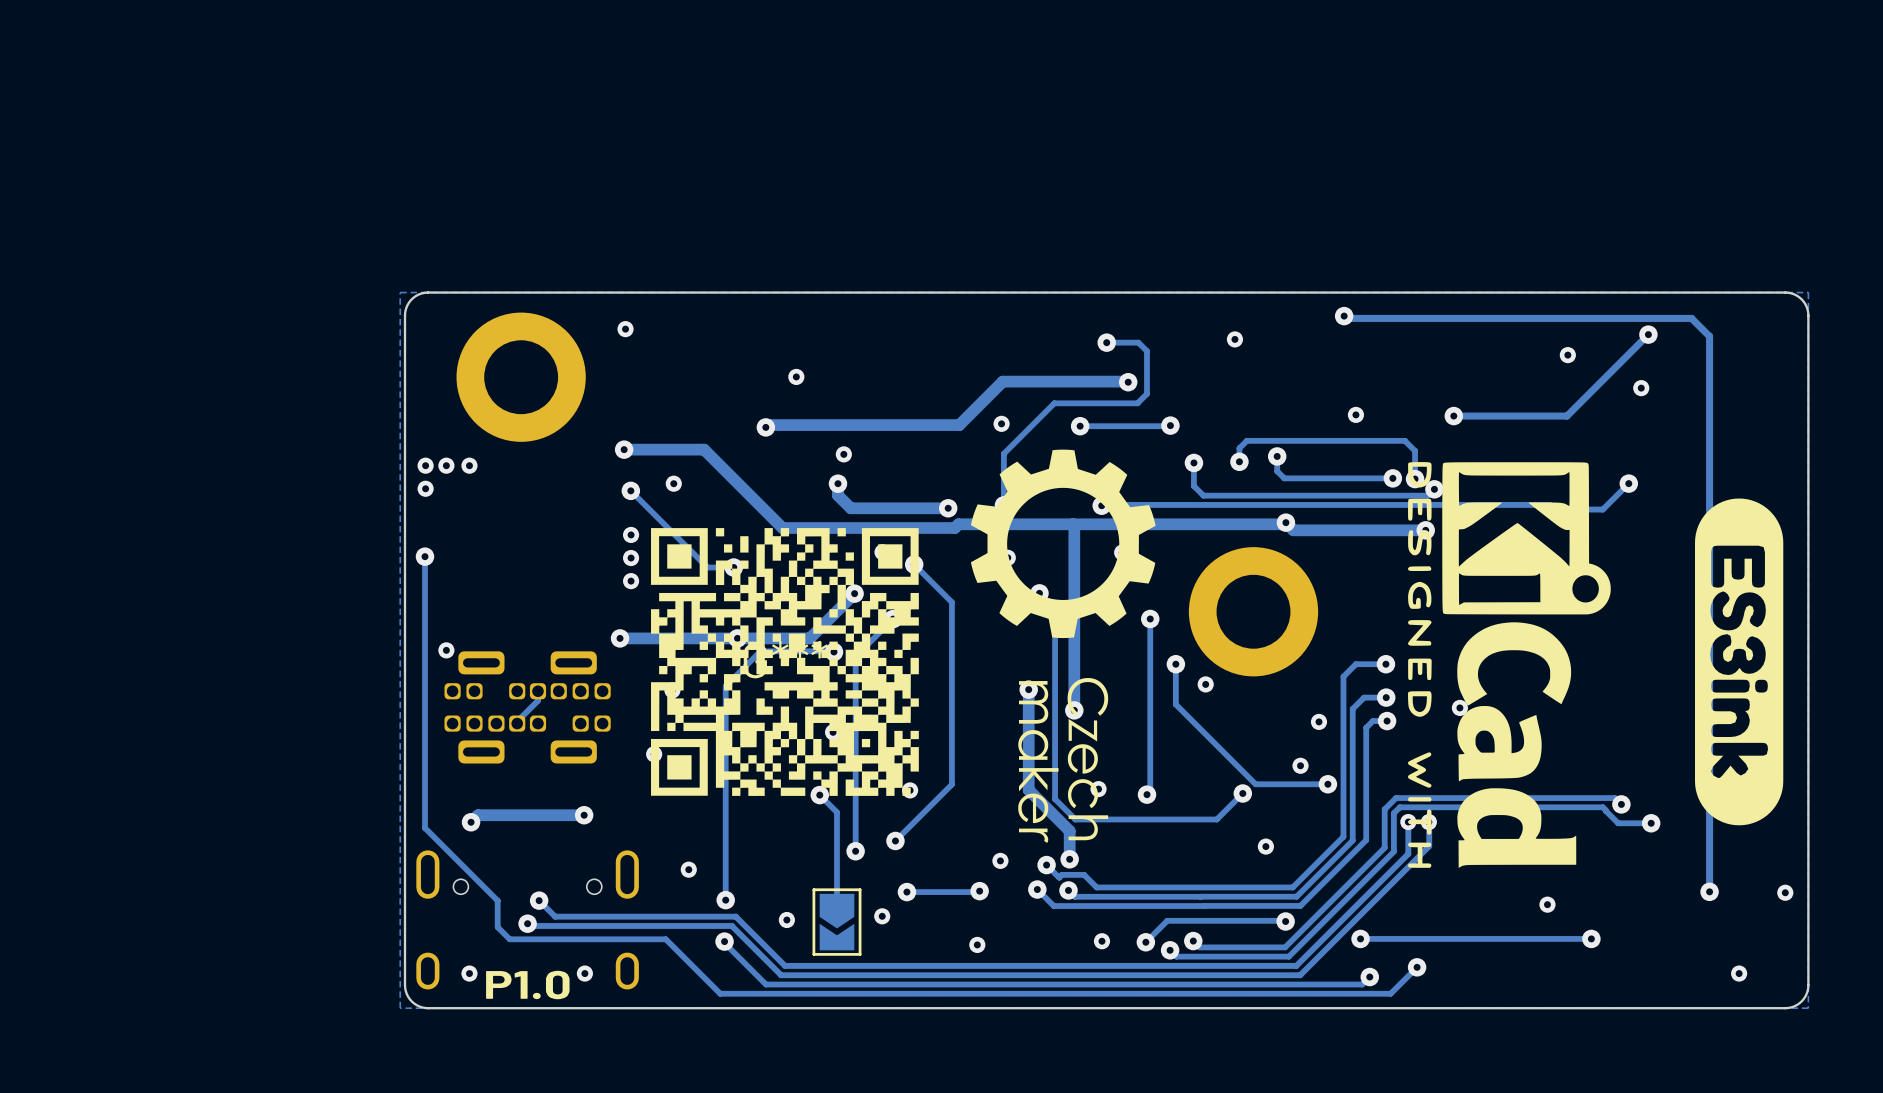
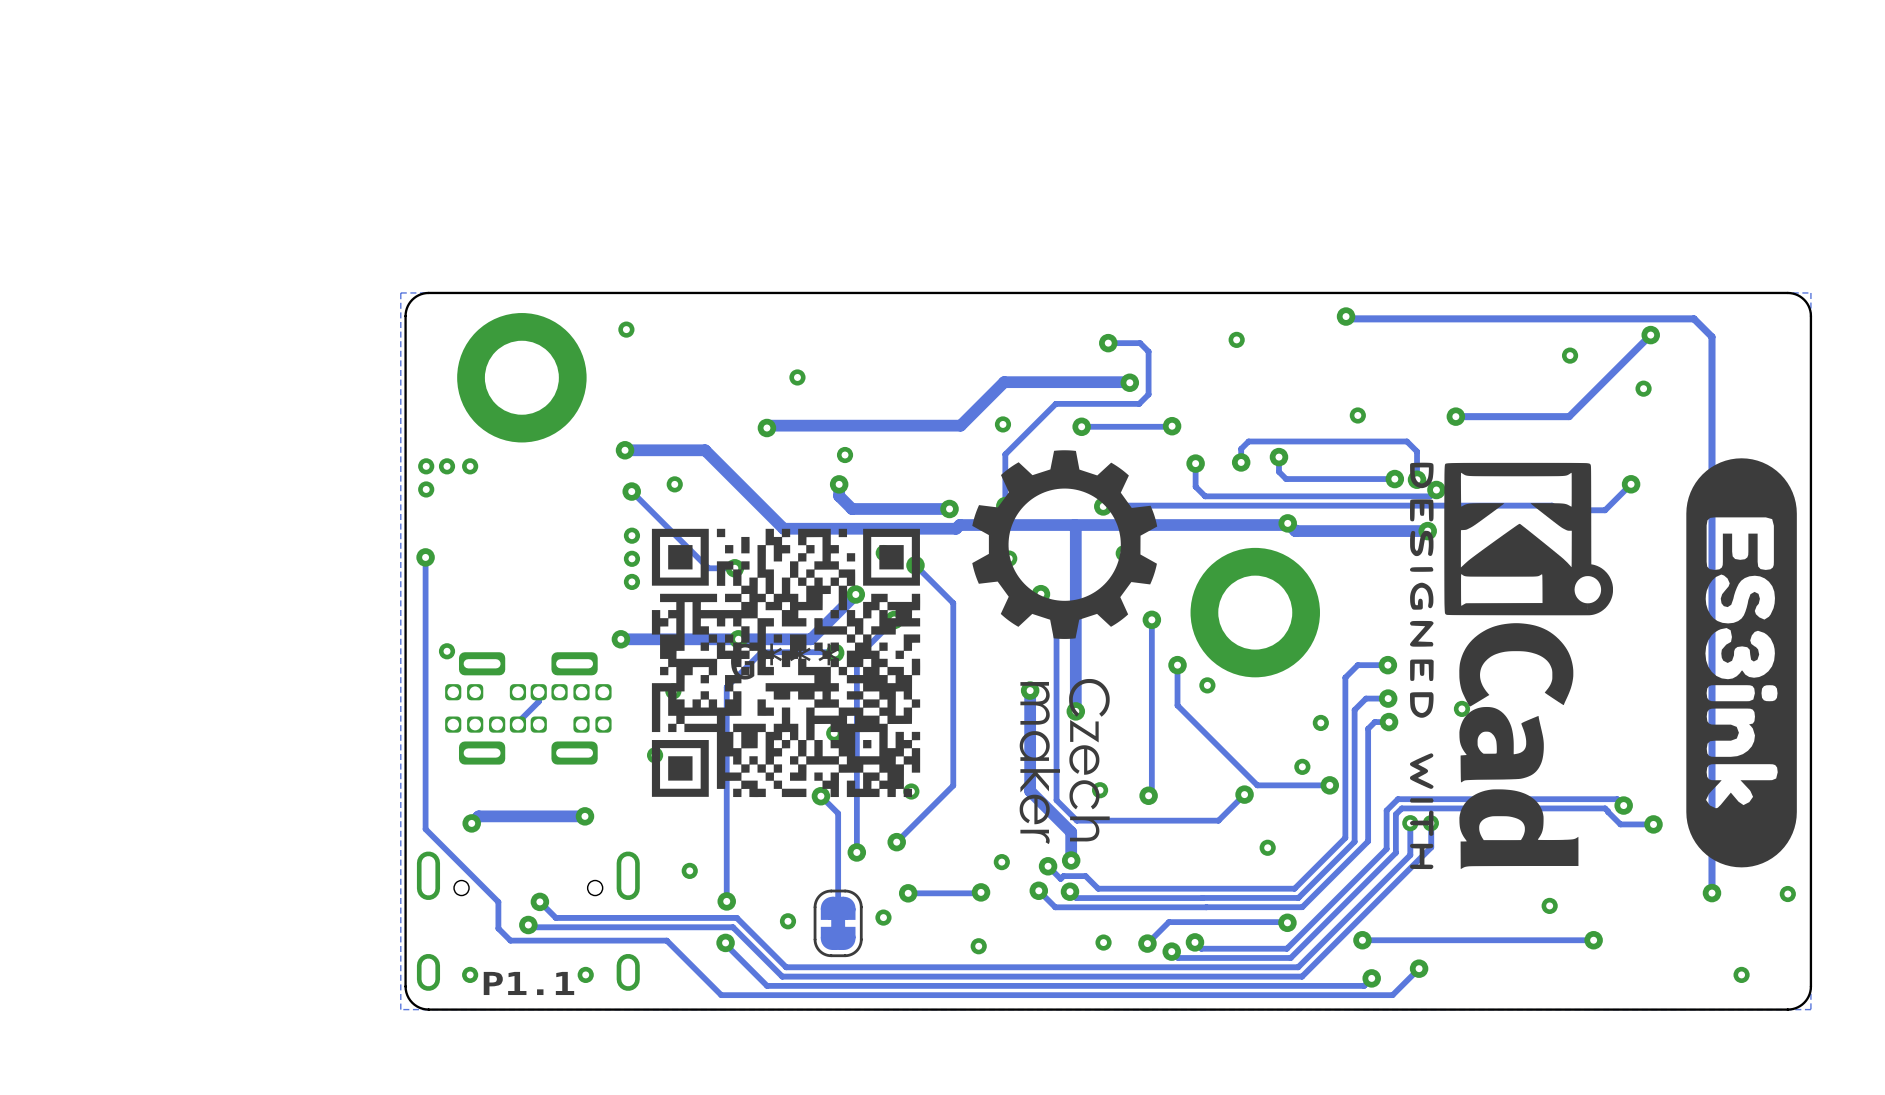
drawing shape: [1694, 498, 1784, 826] -> [1686, 458, 1797, 868]
part footprint: [812, 888, 862, 956] -> [813, 889, 863, 958]
text: P1.0 (527, 985) -> P1.1 (528, 983)

